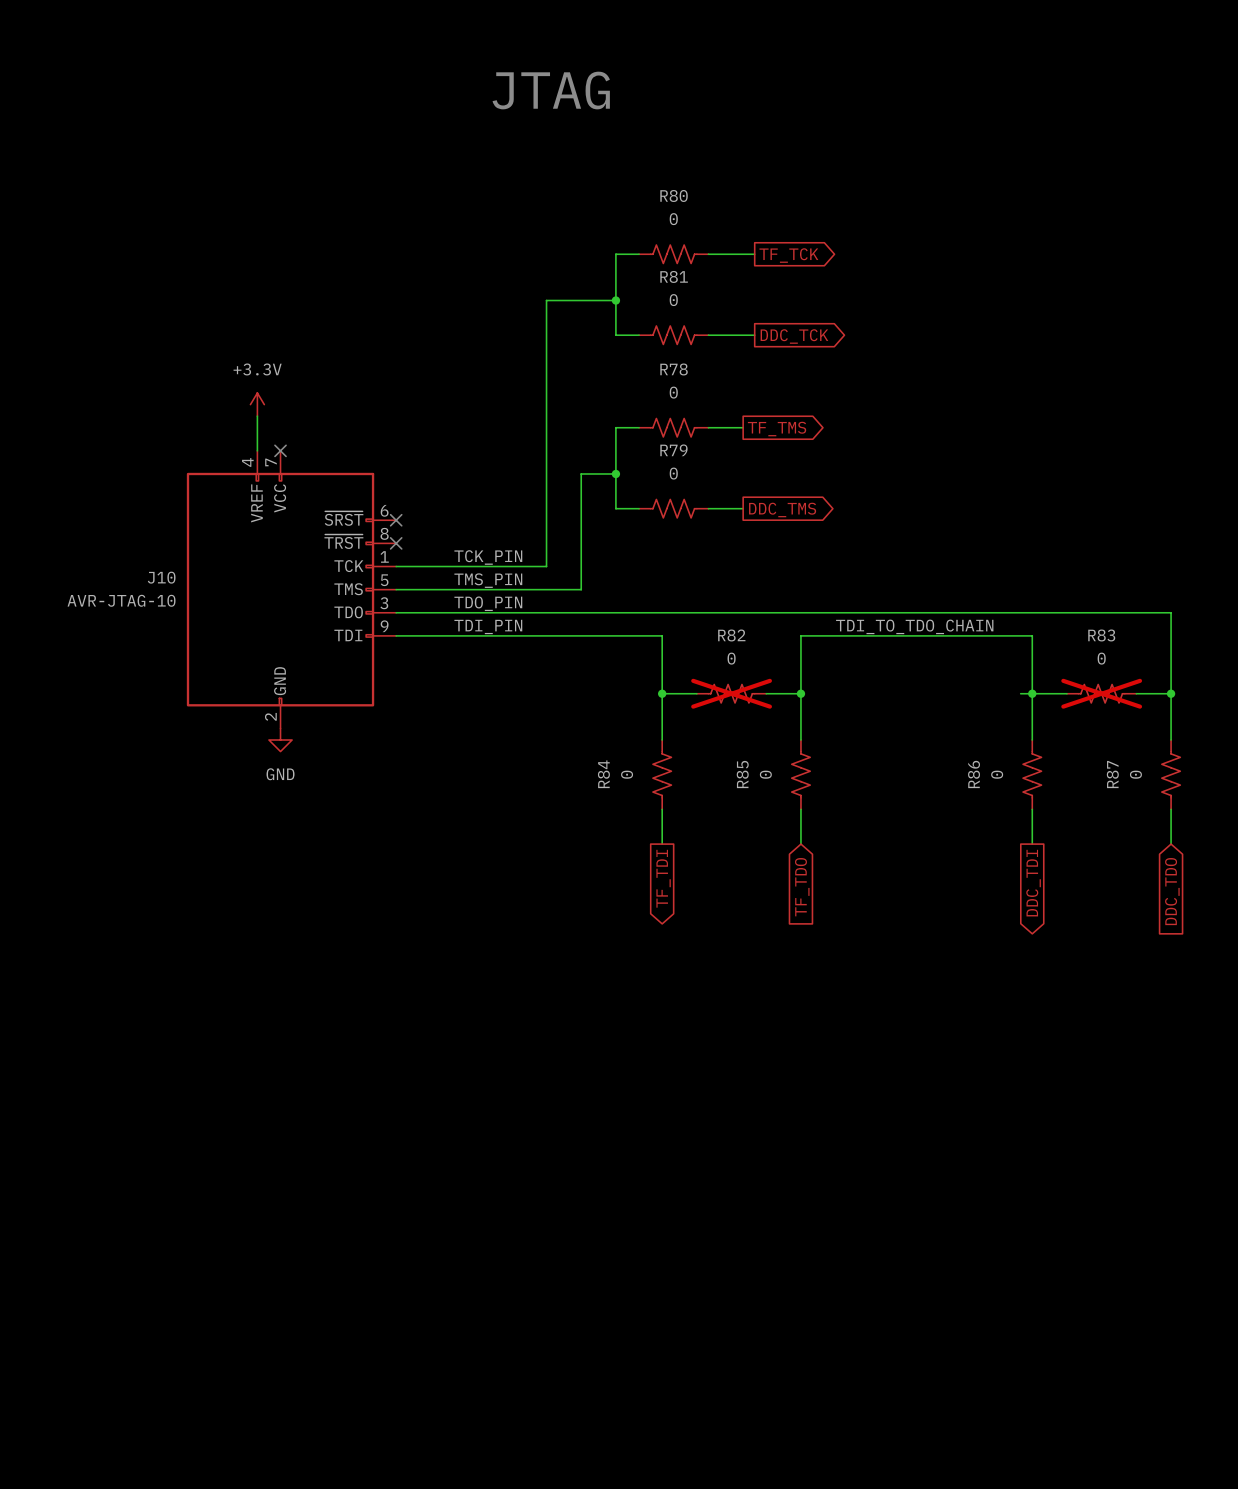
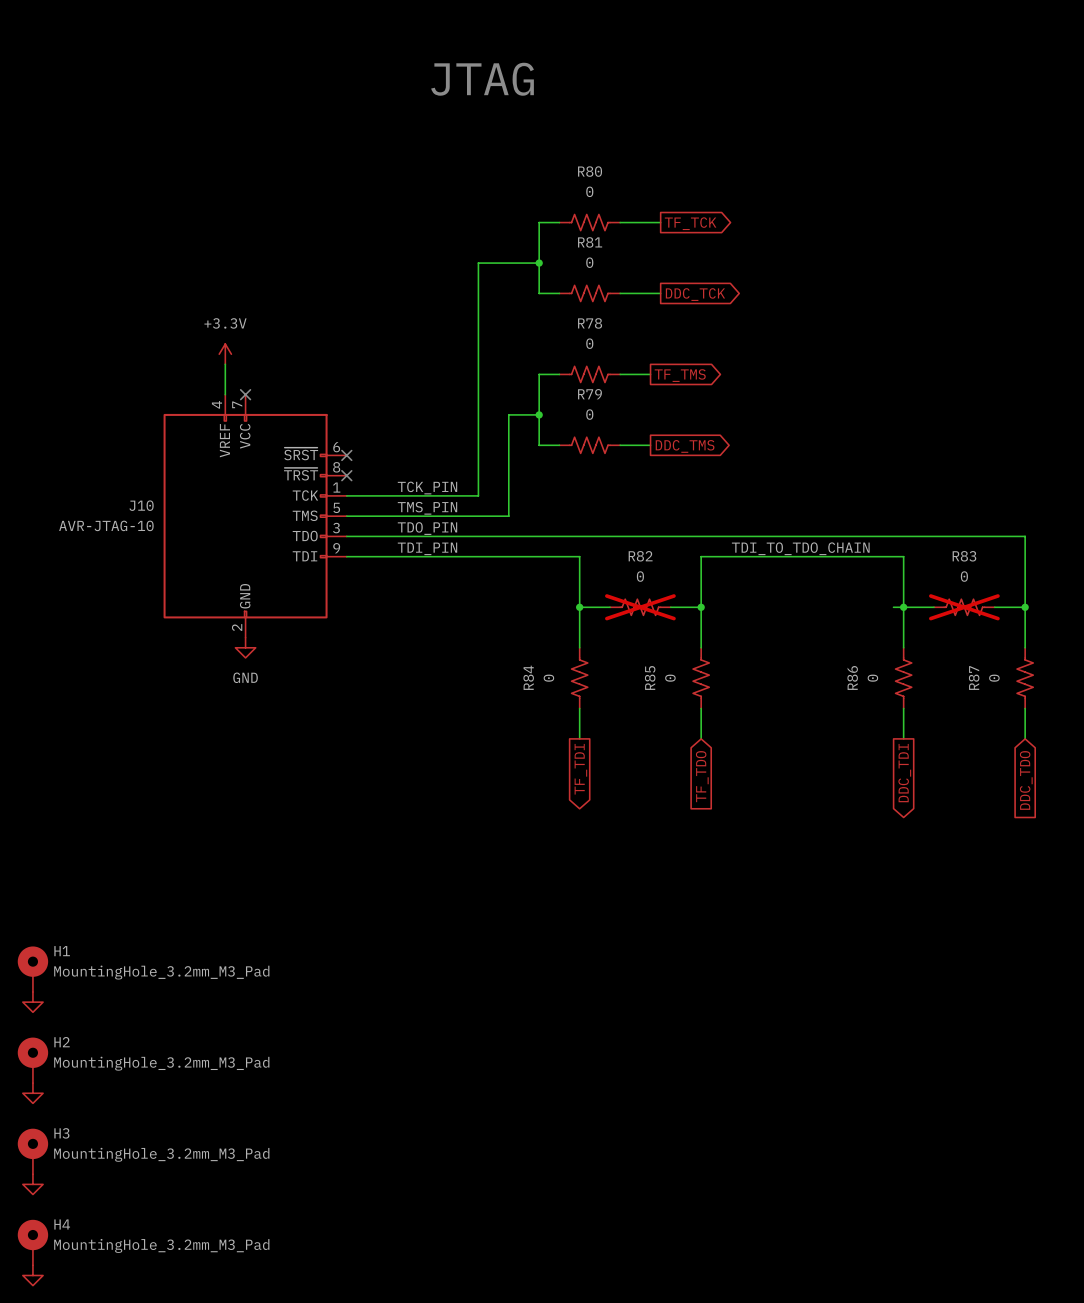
H1: none -> MountingHole_3.2mm_M3_Pad (32, 969)
power symbol: none -> (32, 1002)
H2: none -> MountingHole_3.2mm_M3_Pad (32, 1060)
power symbol: none -> (32, 1093)
H3: none -> MountingHole_3.2mm_M3_Pad (32, 1151)
power symbol: none -> (32, 1184)
H4: none -> MountingHole_3.2mm_M3_Pad (32, 1242)
power symbol: none -> (32, 1275)

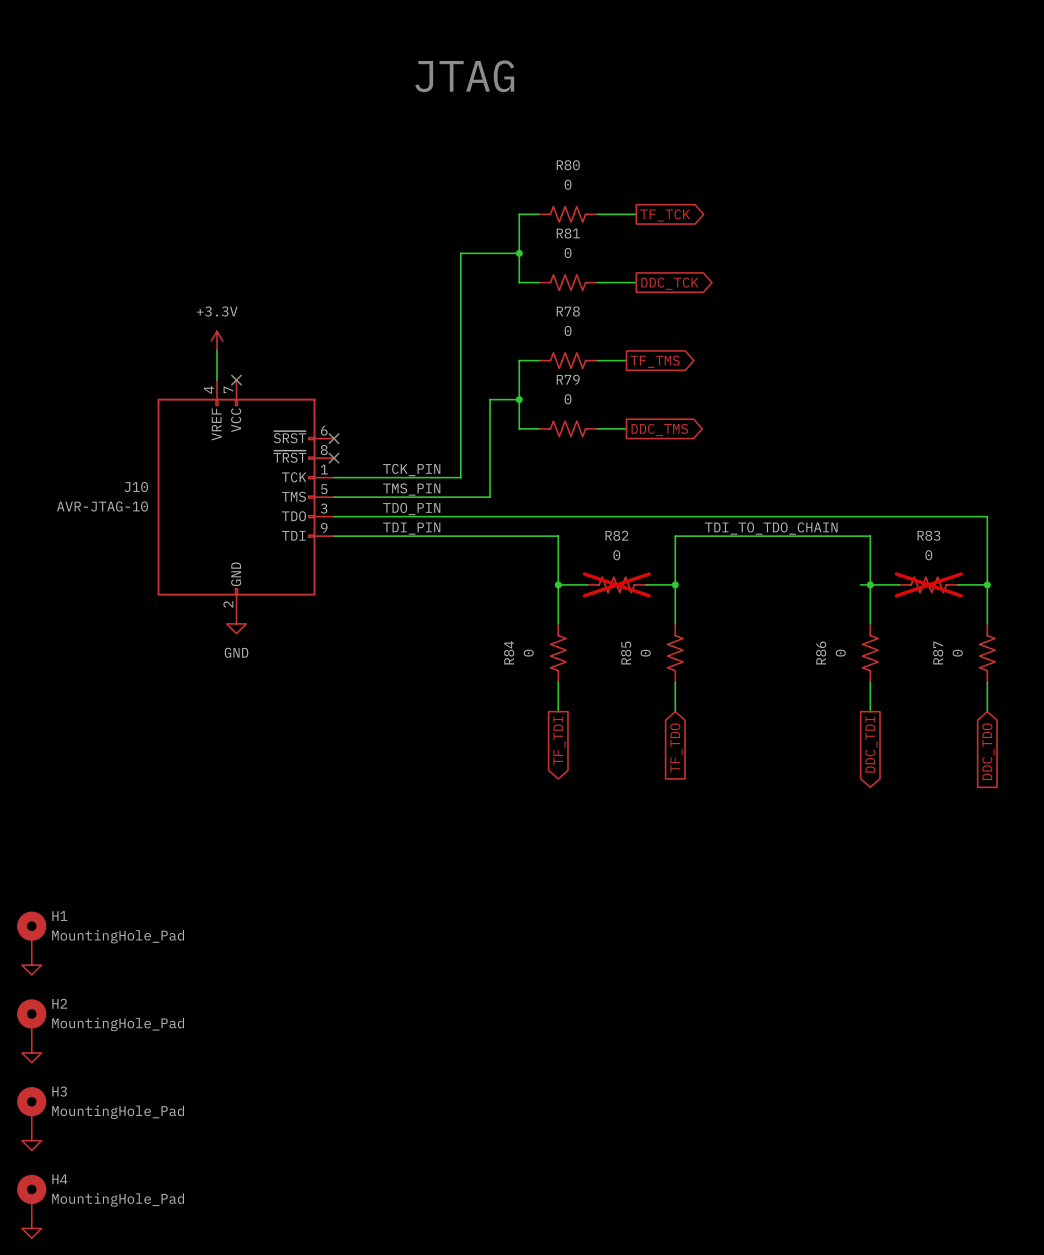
H1 value: MountingHole_3.2mm_M3_Pad (161, 972) -> MountingHole_Pad (118, 936)
H2 value: MountingHole_3.2mm_M3_Pad (161, 1063) -> MountingHole_Pad (118, 1024)
H3 value: MountingHole_3.2mm_M3_Pad (161, 1154) -> MountingHole_Pad (118, 1112)
H4 value: MountingHole_3.2mm_M3_Pad (161, 1245) -> MountingHole_Pad (118, 1199)

